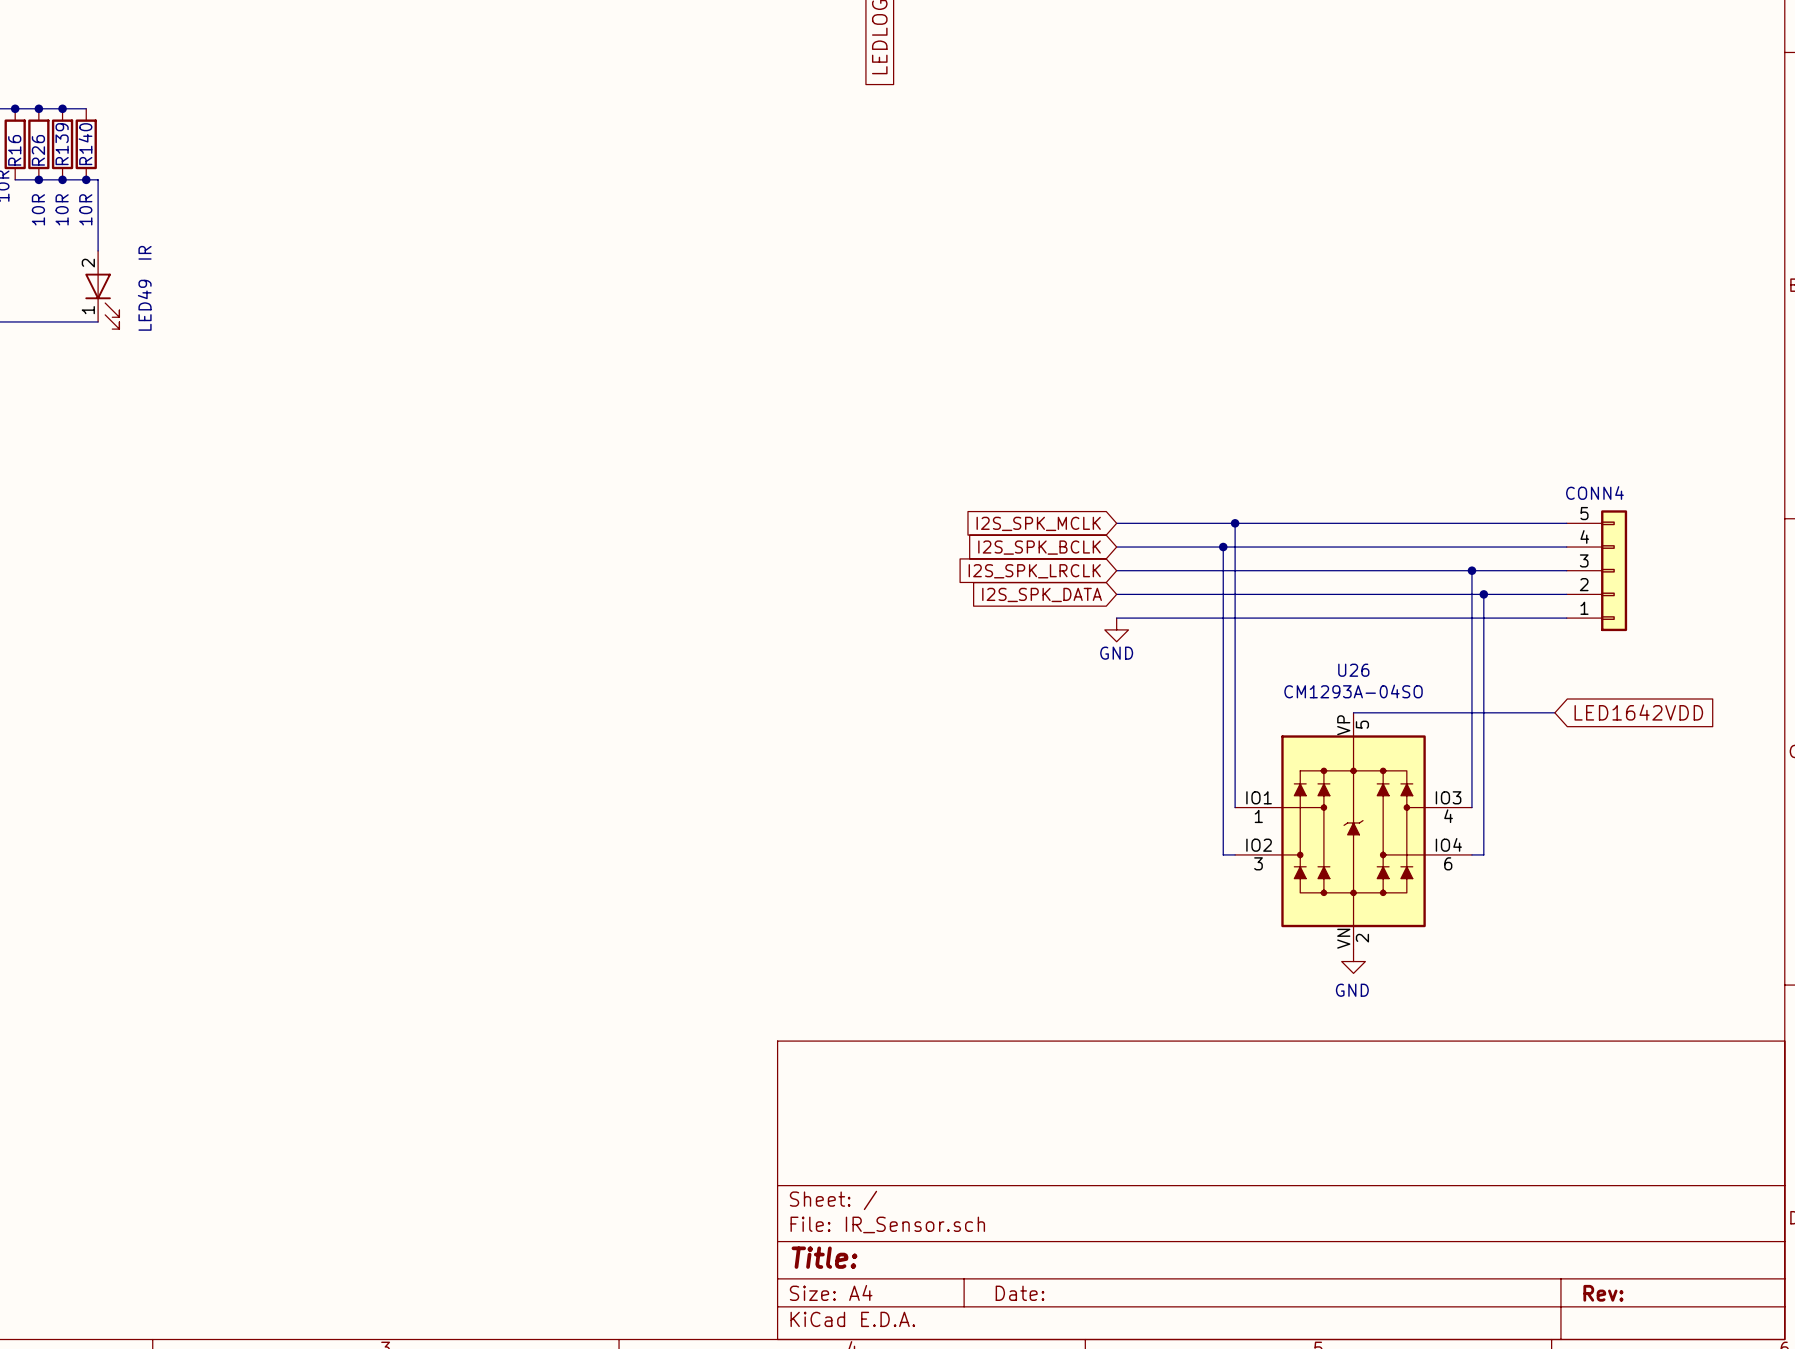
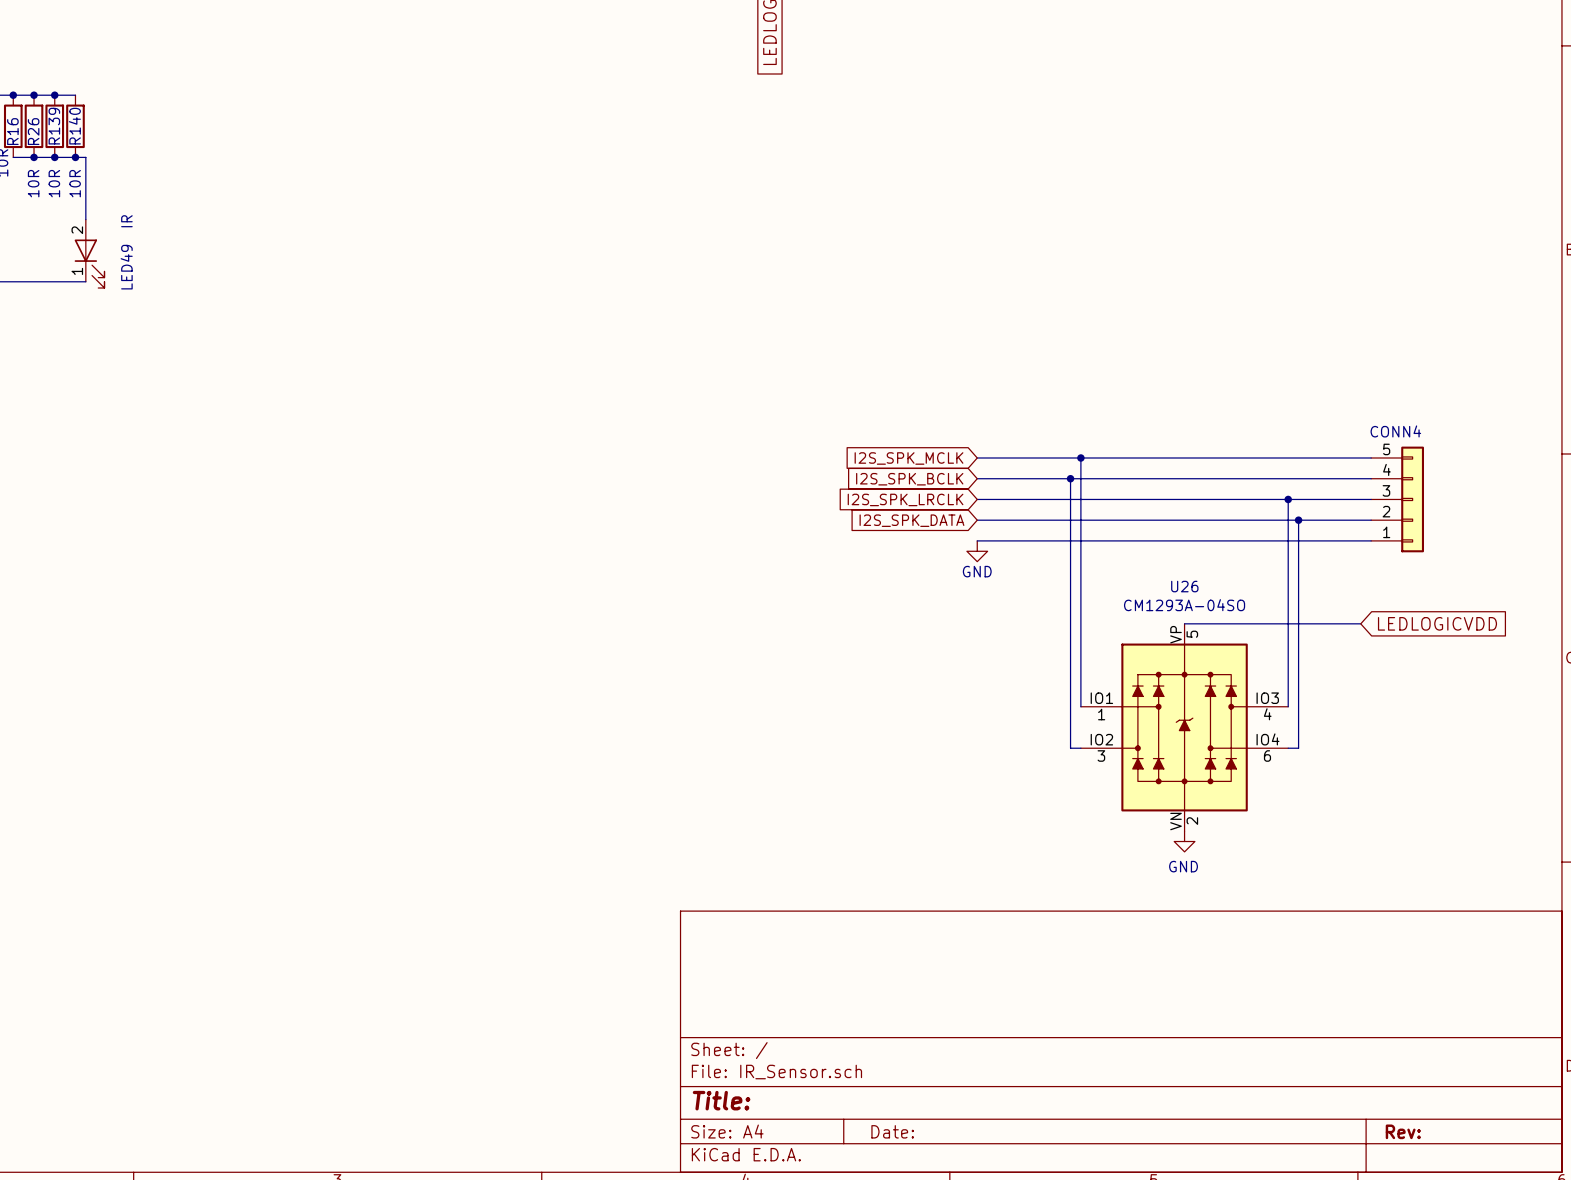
global label: LED1642VDD (1638, 712) -> LEDLOGICVDD (1437, 623)

